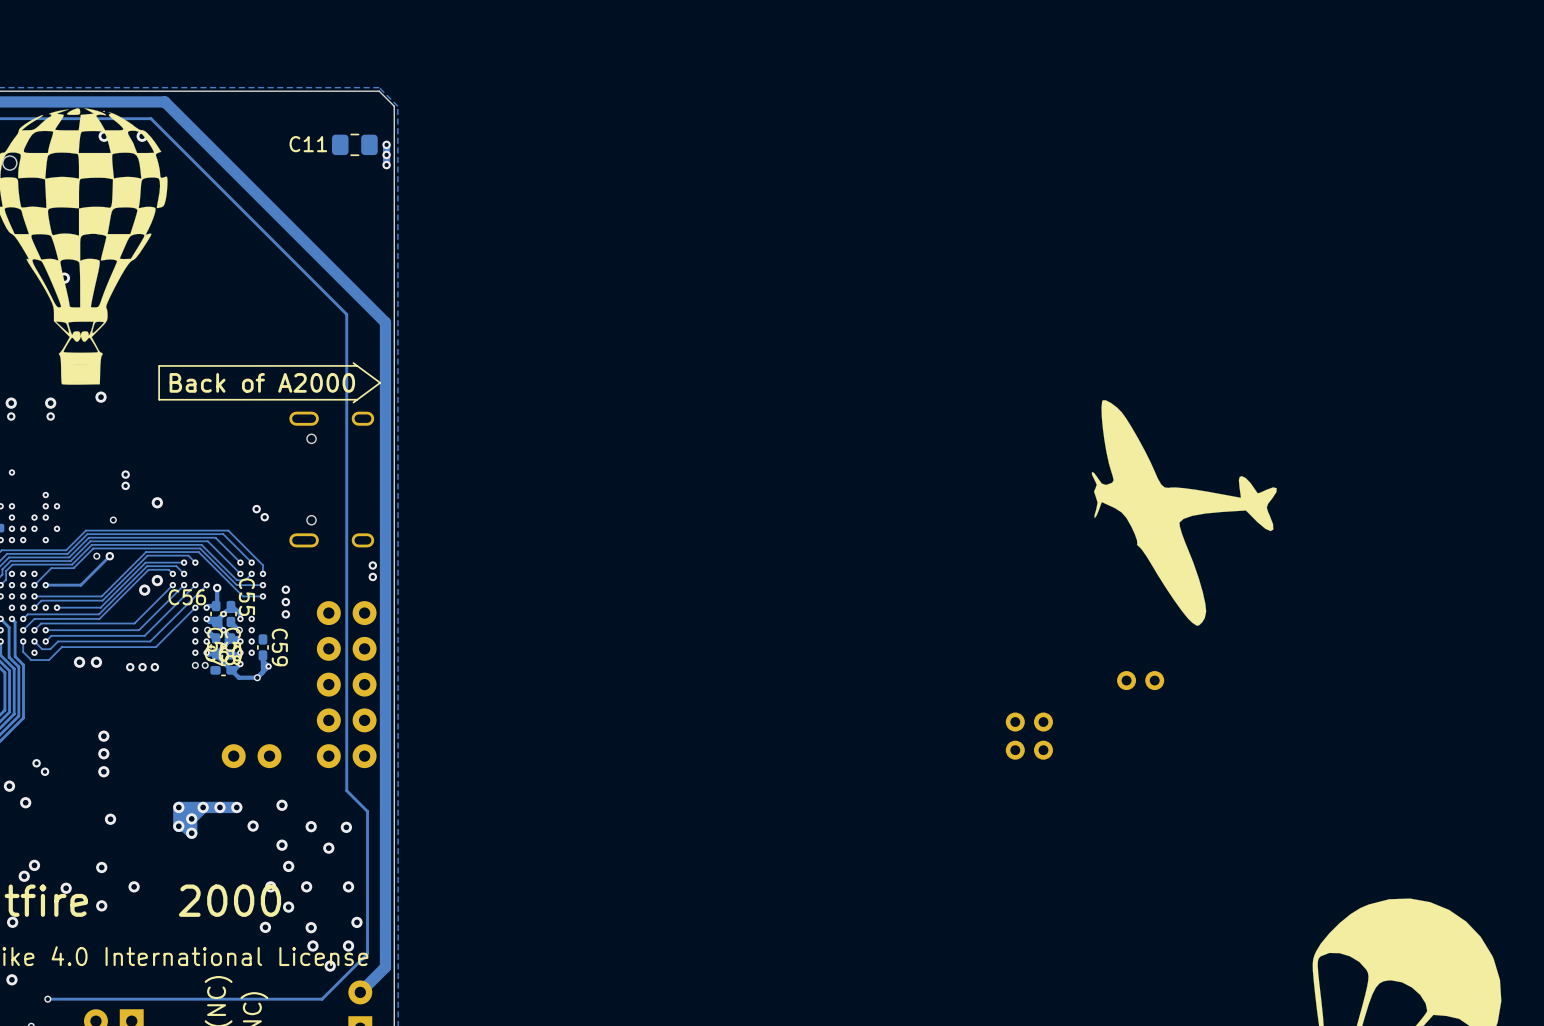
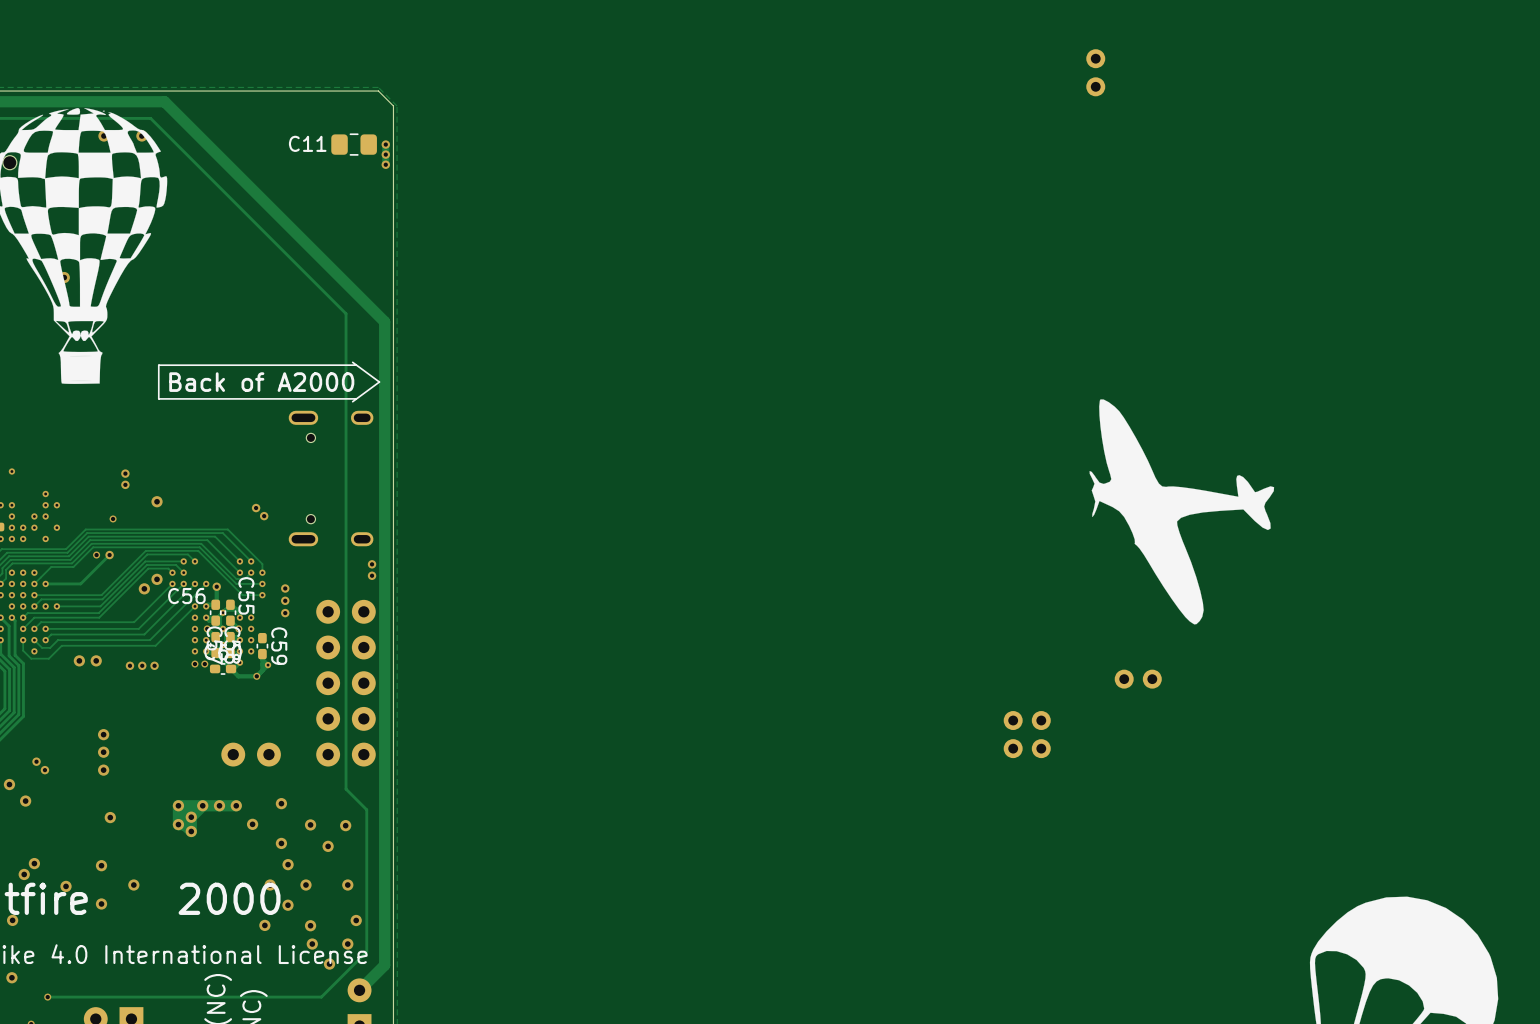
part: none -> (1095, 72)
via: (101, 397) -> none
via: (11, 403) -> none
via: (50, 403) -> none
via: (11, 416) -> none
via: (50, 416) -> none

